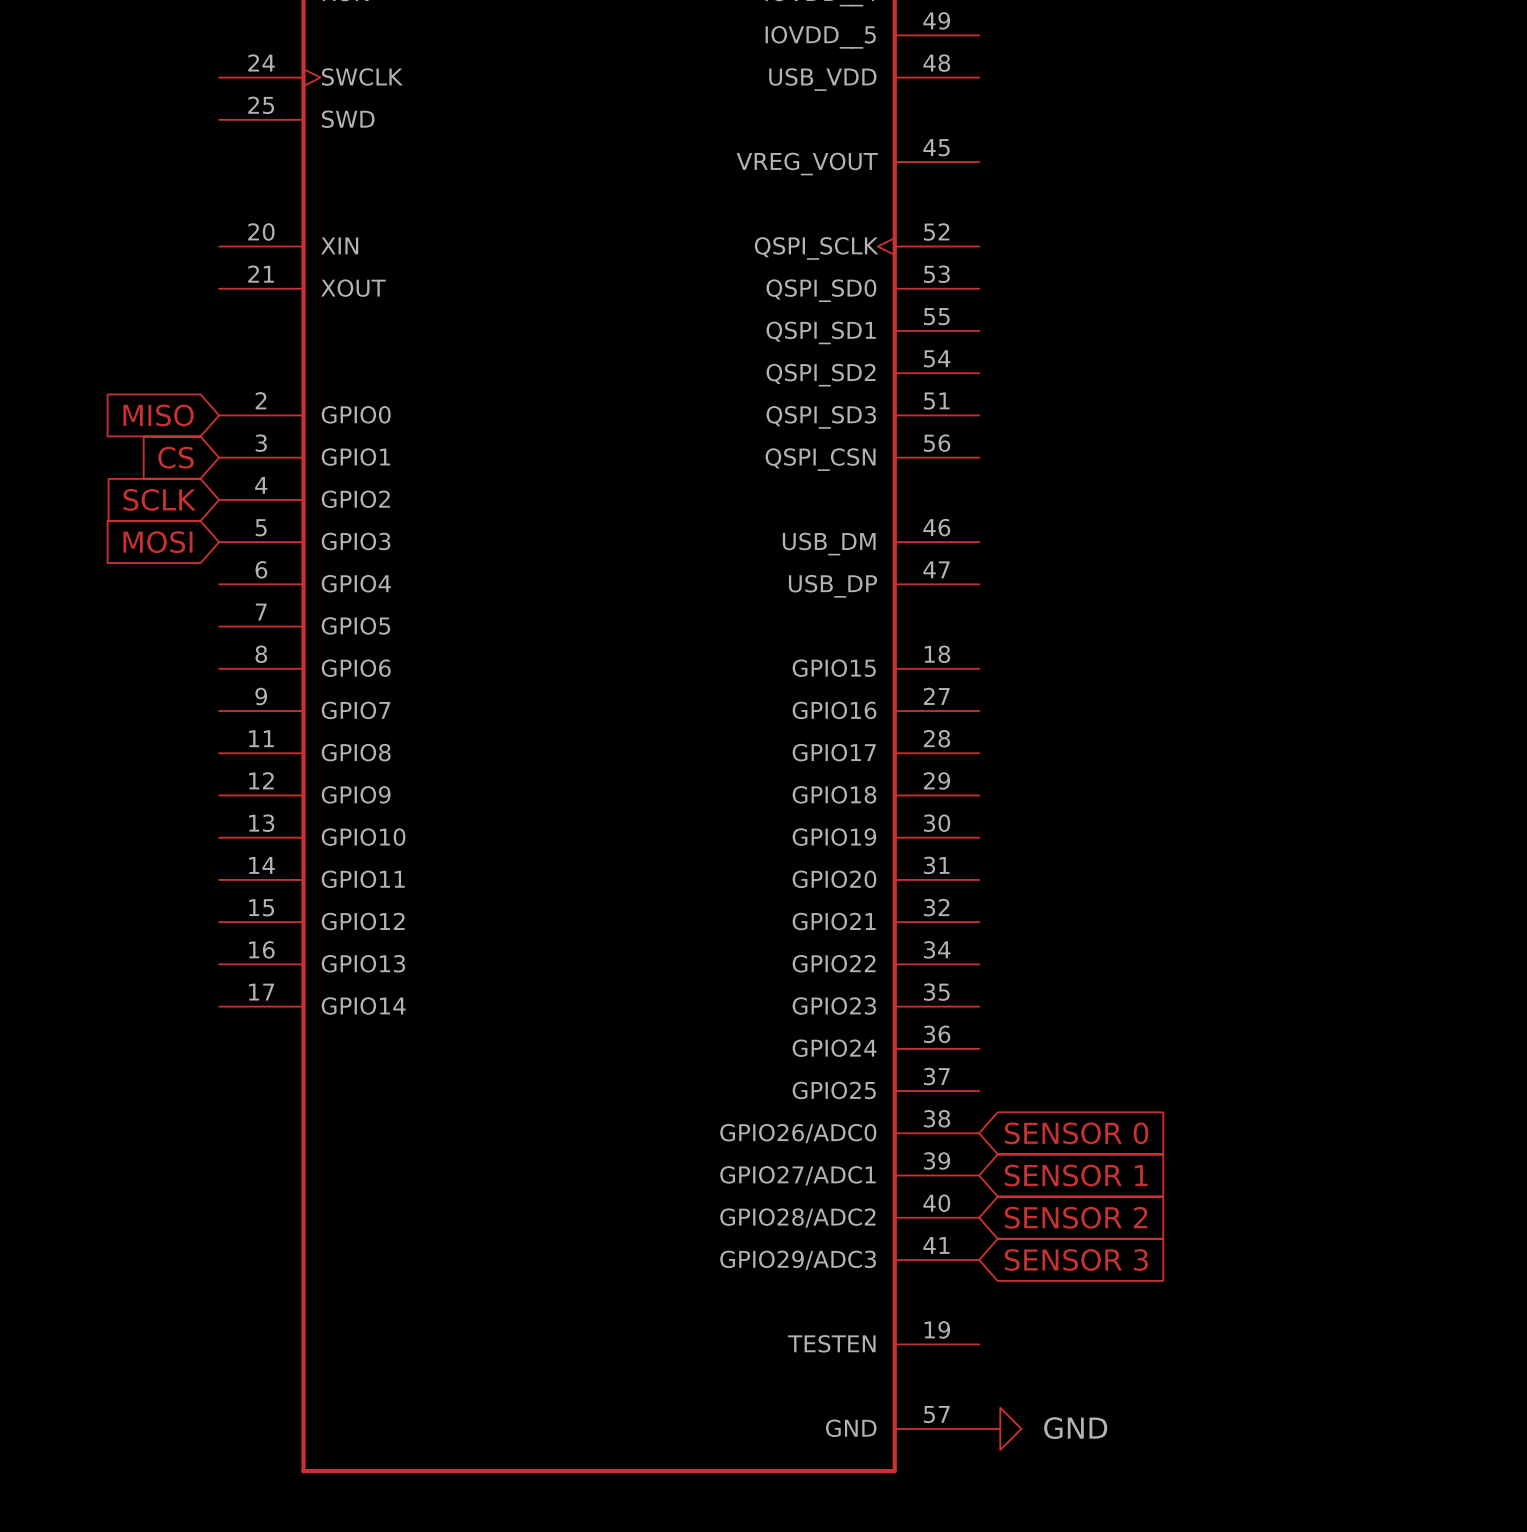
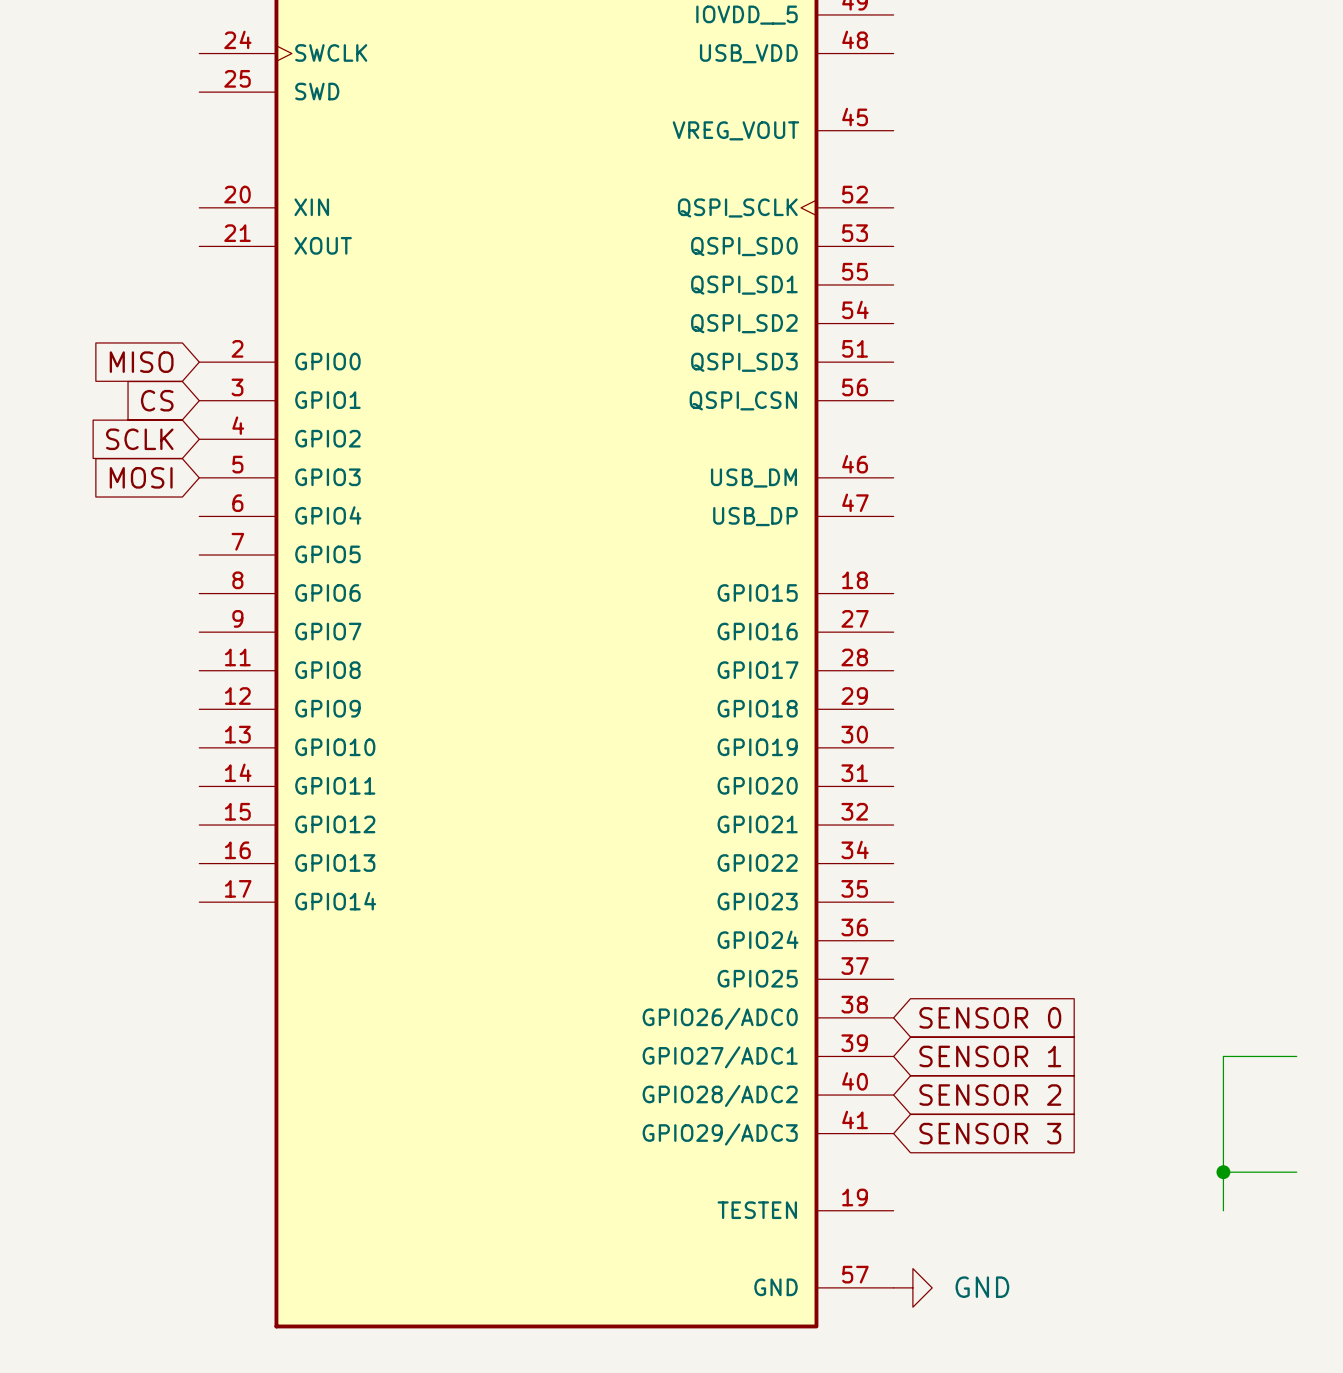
wire: none -> (1296, 1056) (1223, 1056) (1223, 1210)
wire: none -> (1223, 1172) (1296, 1172)
junction: none -> (1223, 1172)

